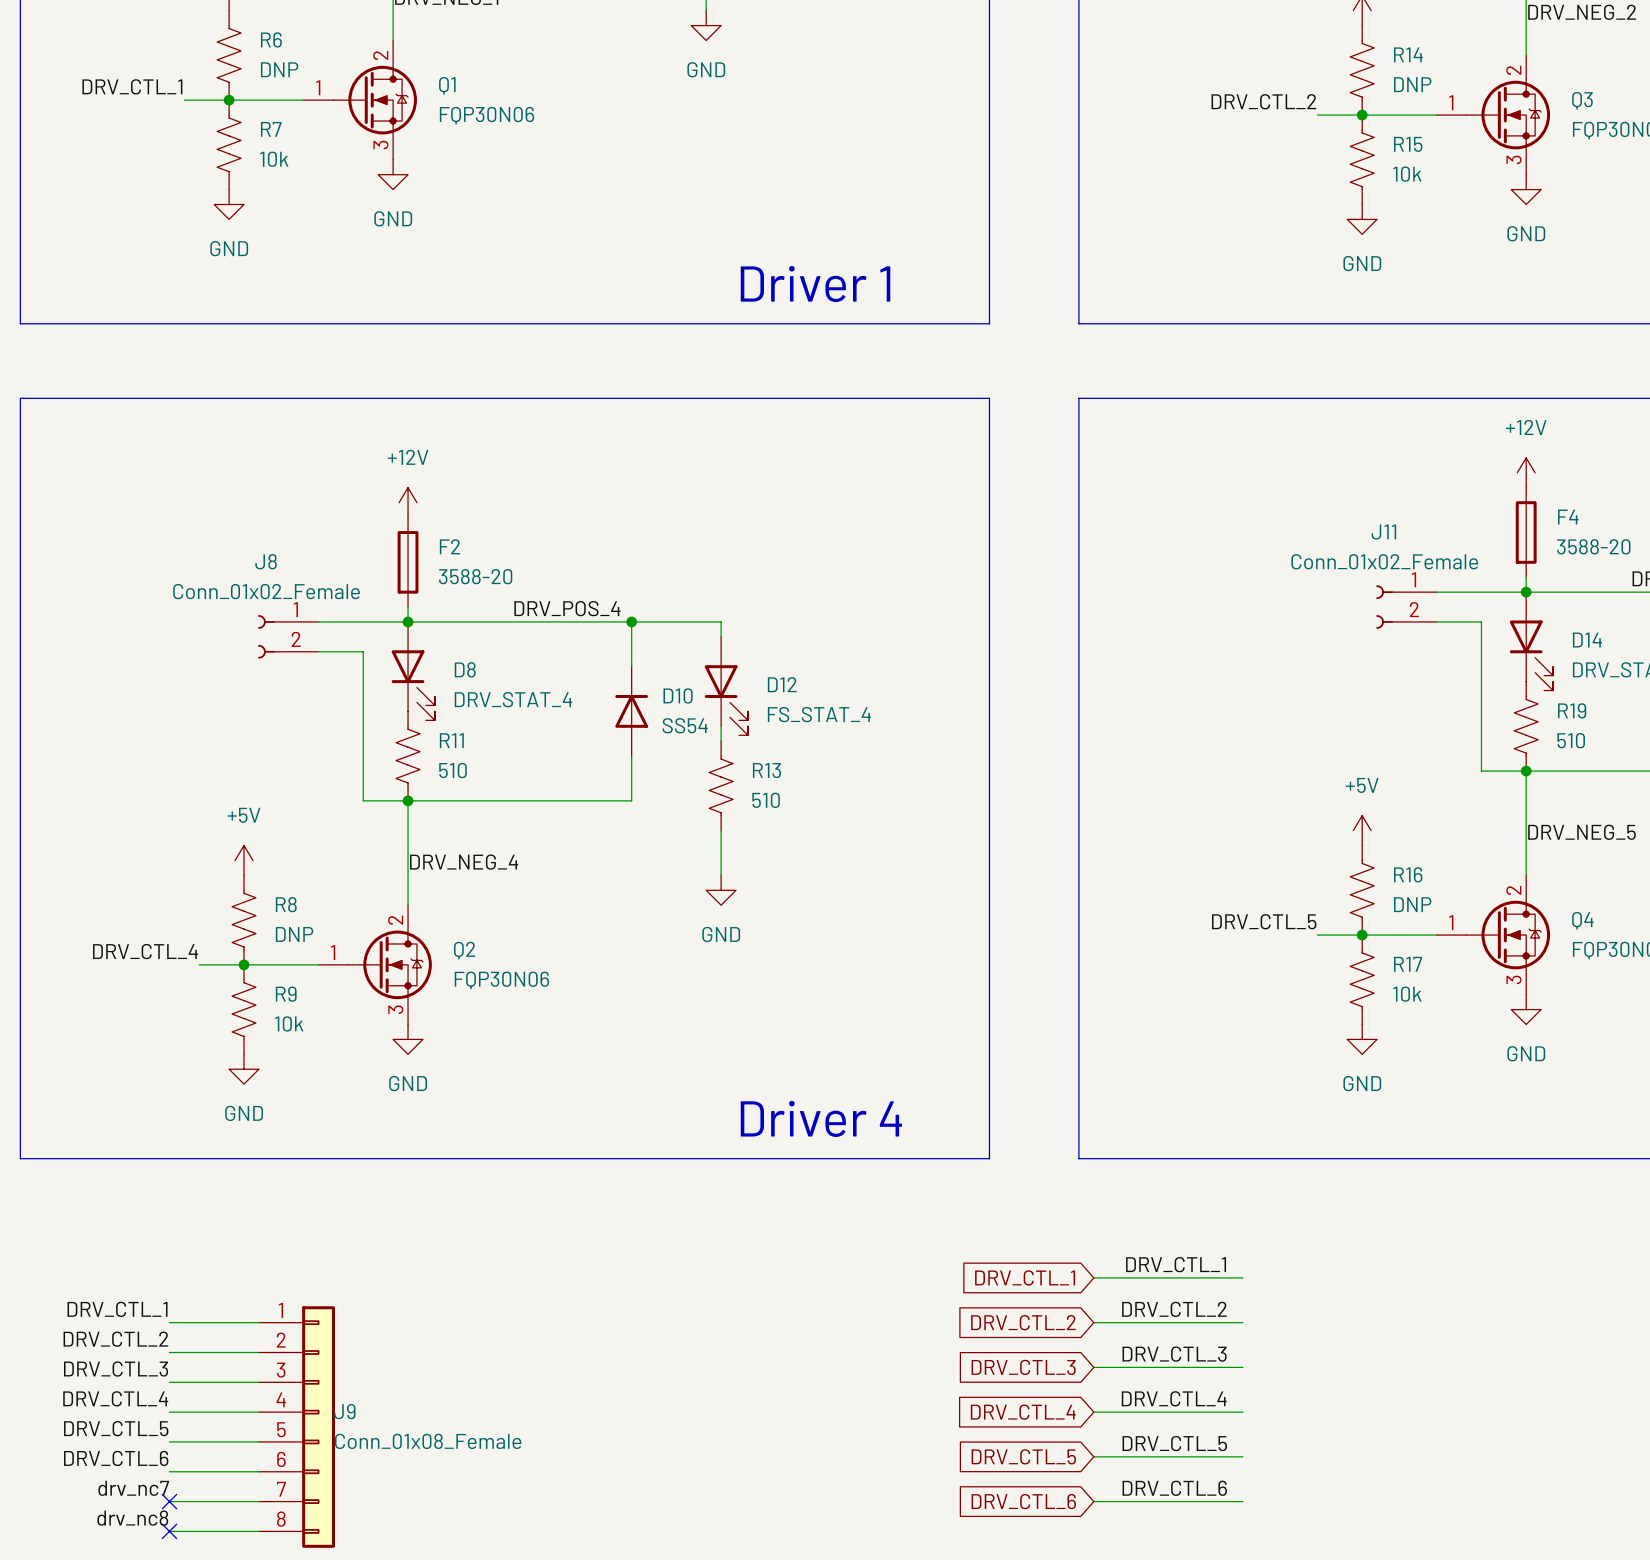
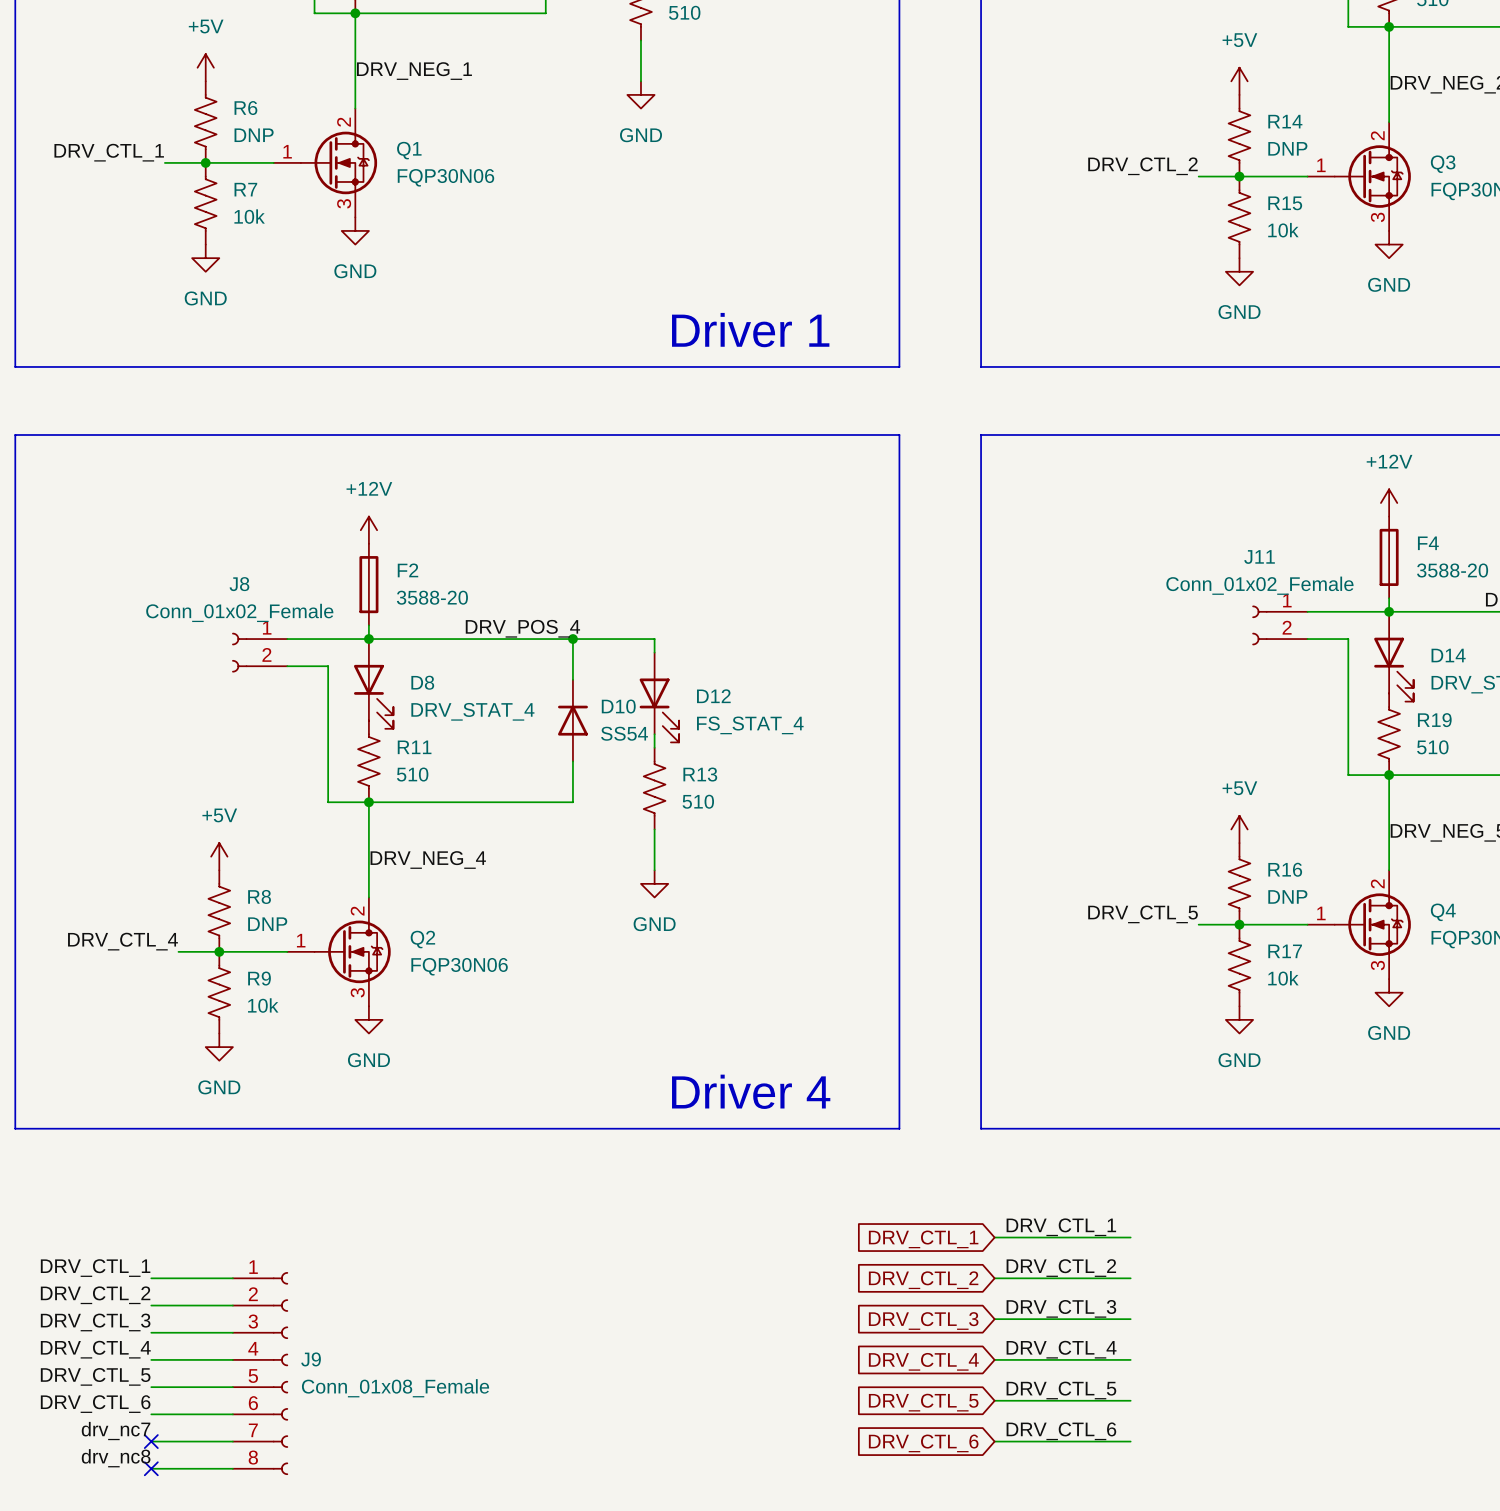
J9 symbol: [258, 1306, 335, 1548] -> [232, 1272, 289, 1476]

